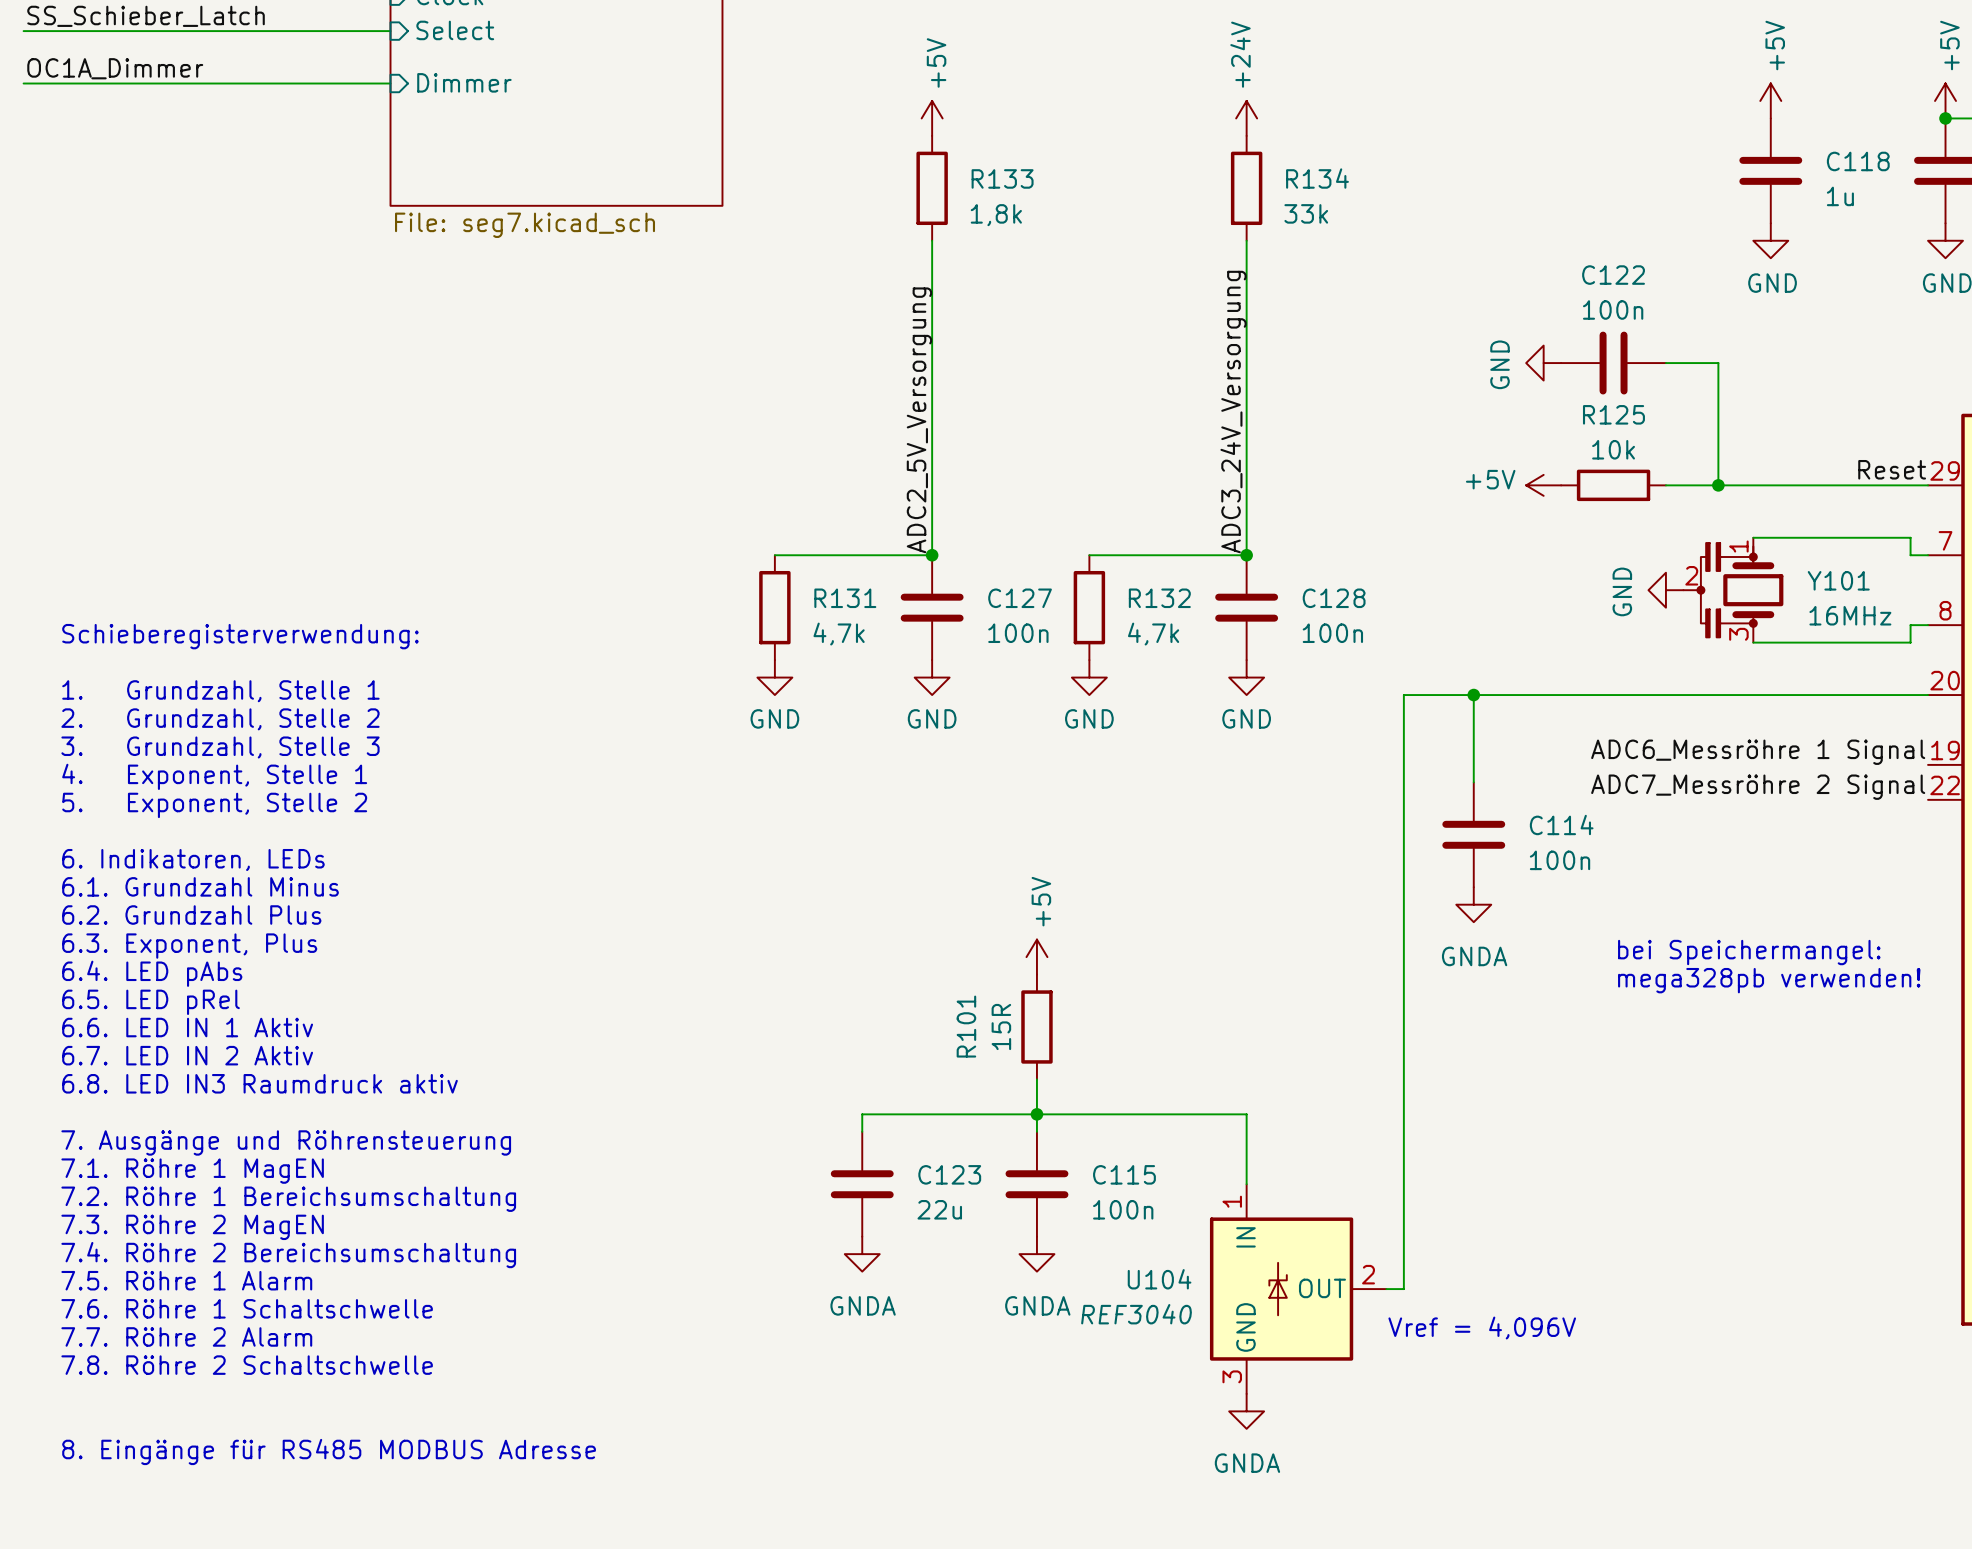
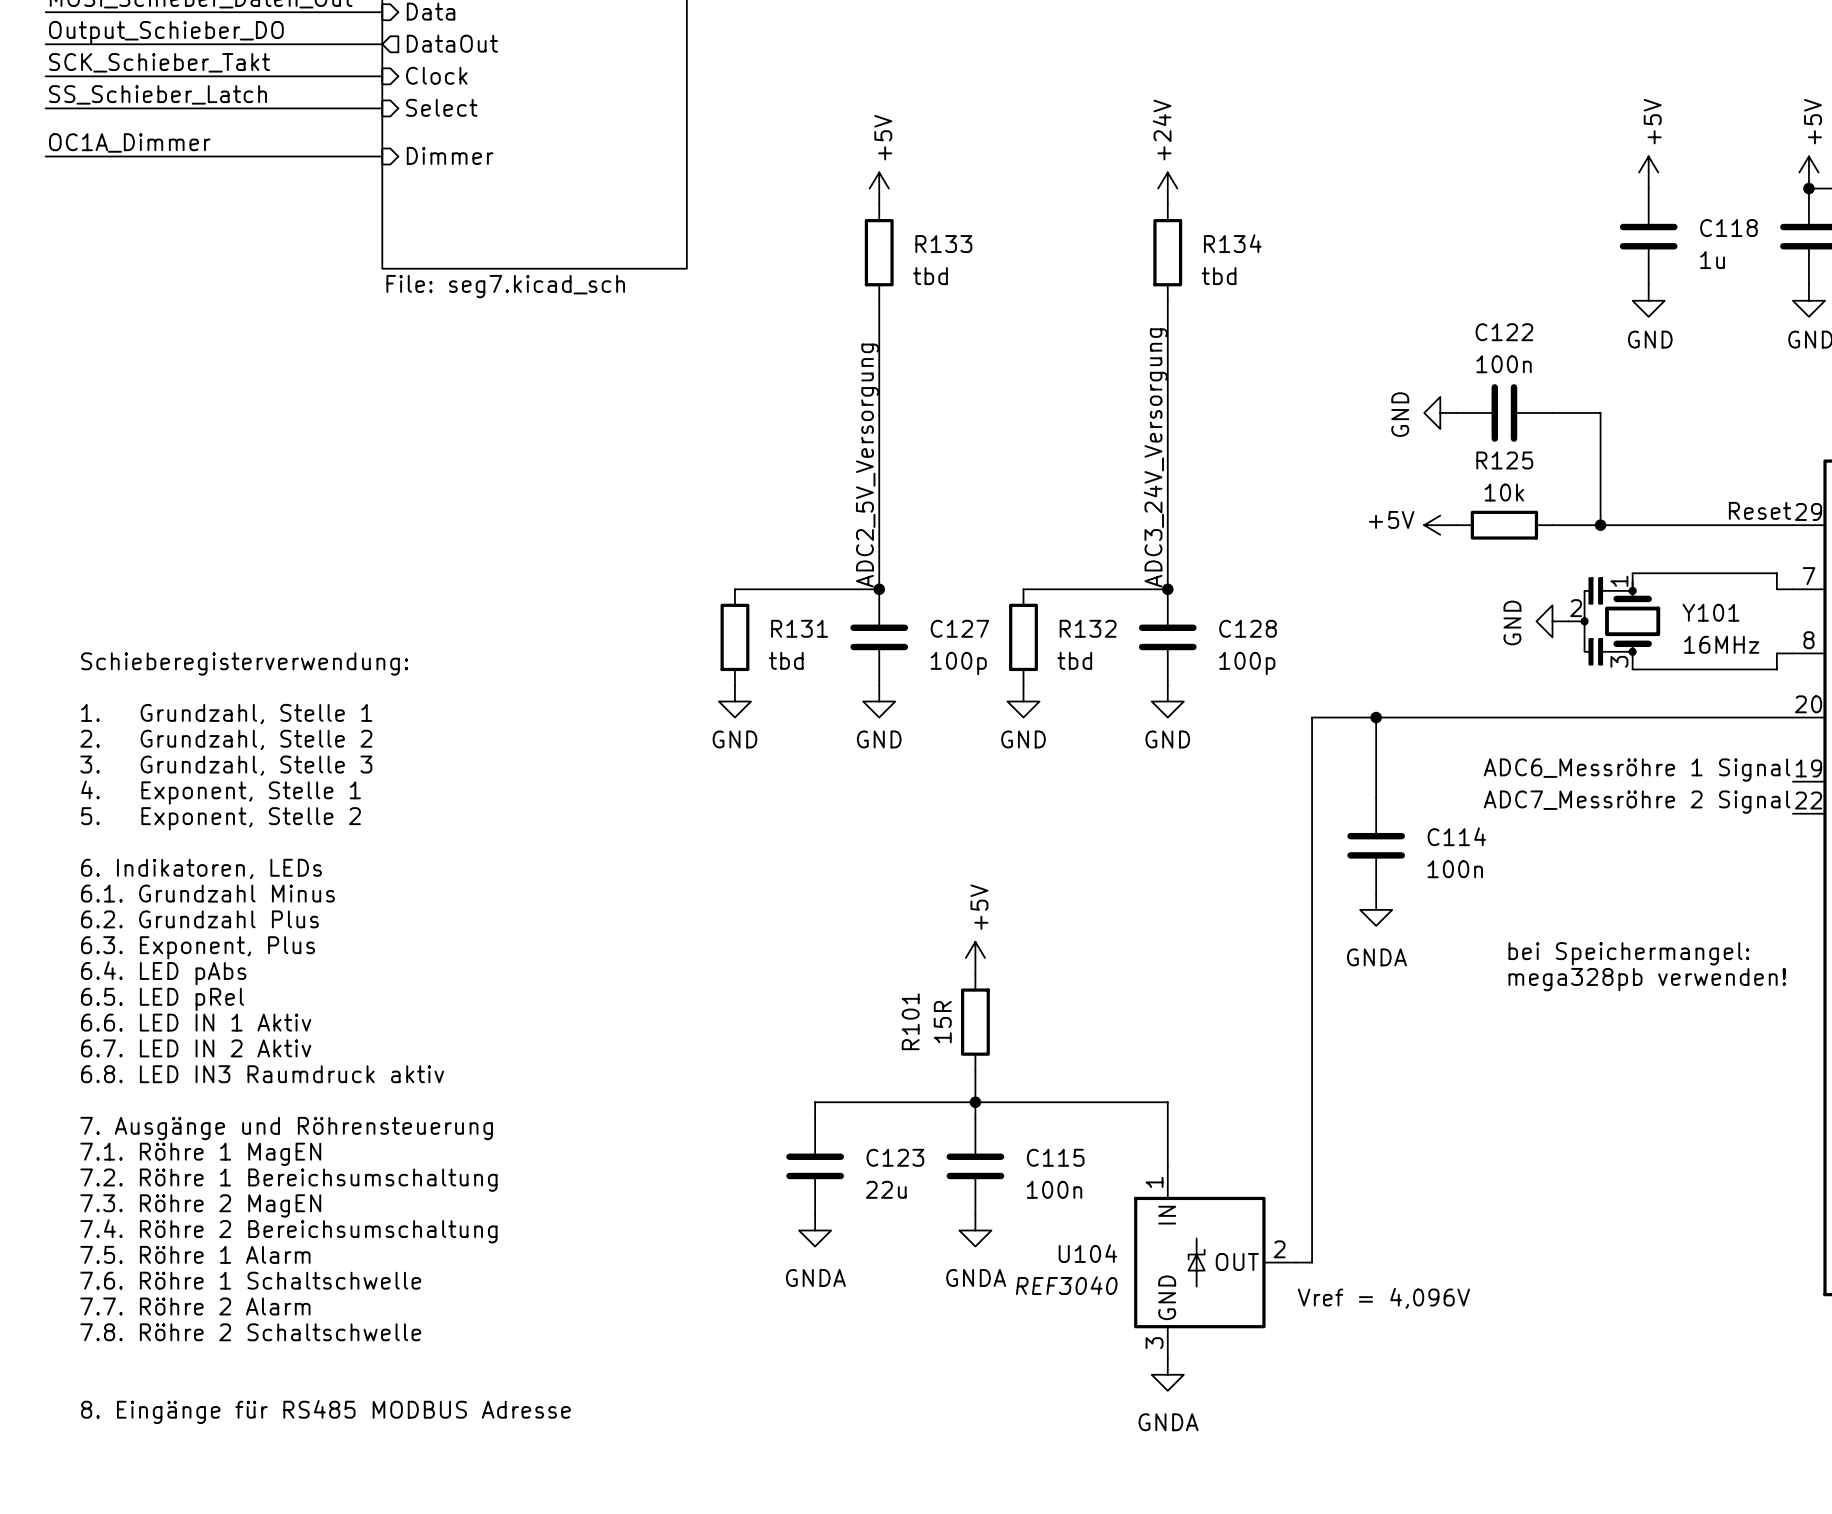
R134 value: 33k (1306, 213) -> tbd (1219, 276)
R133 value: 1,8k (996, 215) -> tbd (930, 276)
C127 value: 100n (1018, 633) -> 100p (958, 663)
C128 value: 100n (1332, 633) -> 100p (1247, 663)
R131 value: 4,7k (839, 634) -> tbd (786, 660)
R132 value: 4,7k (1153, 634) -> tbd (1074, 660)

